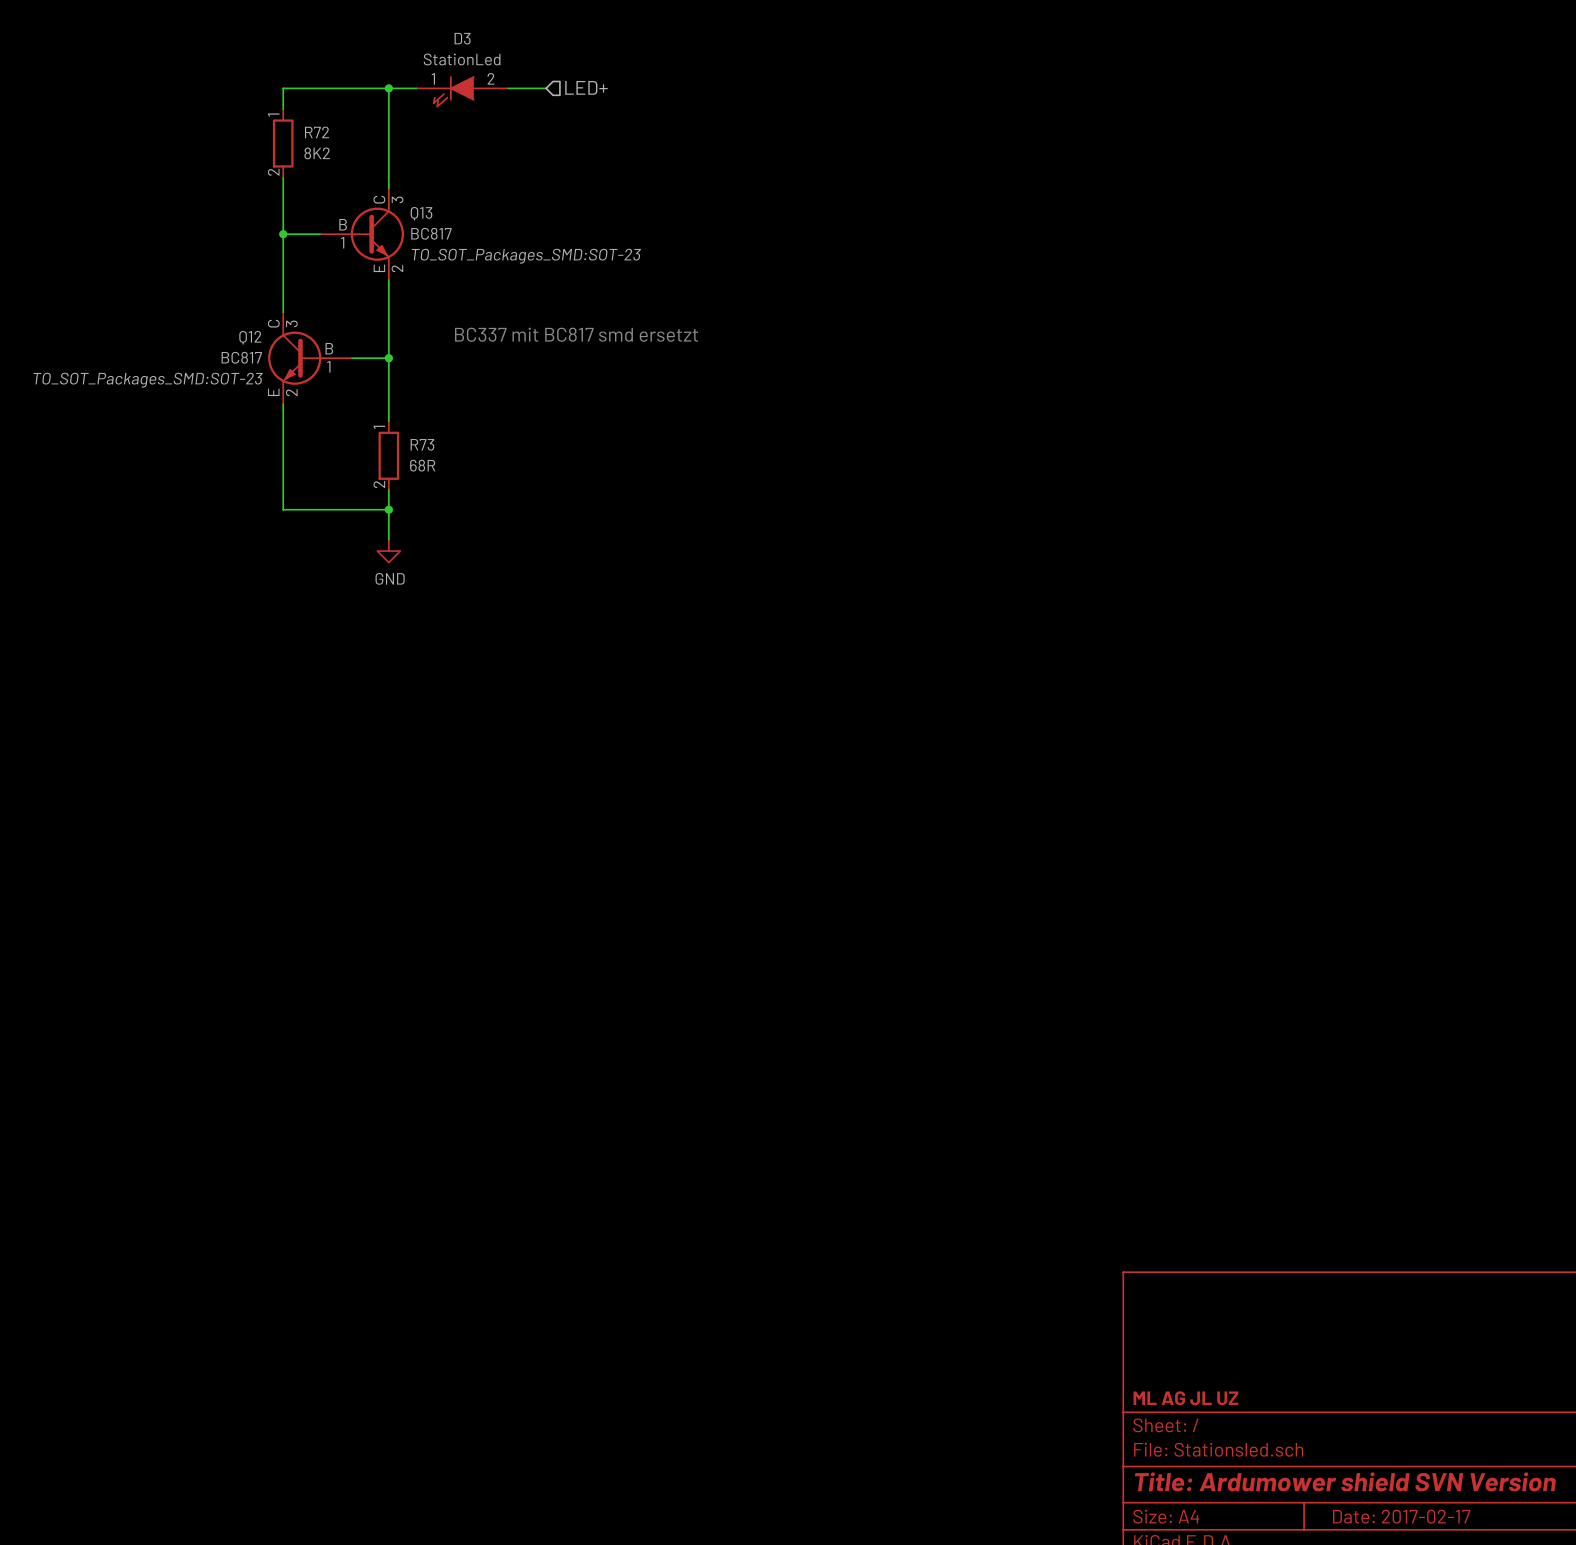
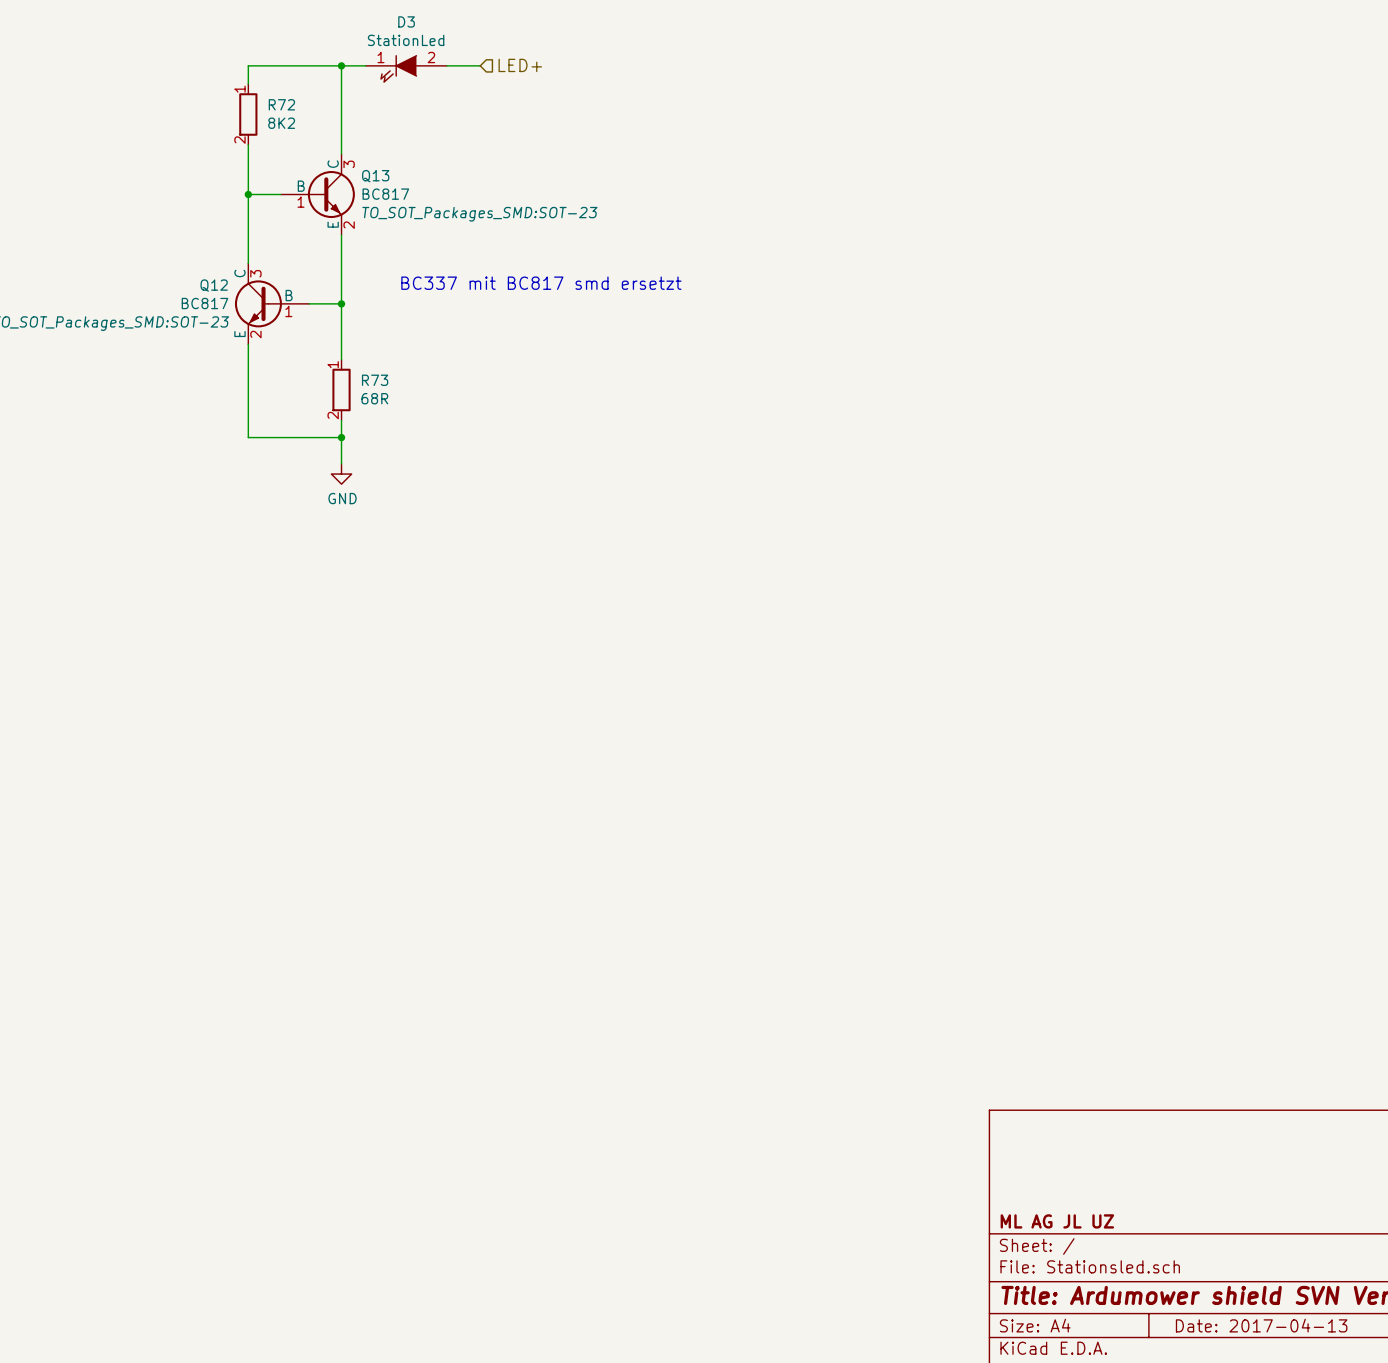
title block: Date: 2017-02-17 (1401, 1516) -> Date: 2017-04-13 (1261, 1325)

